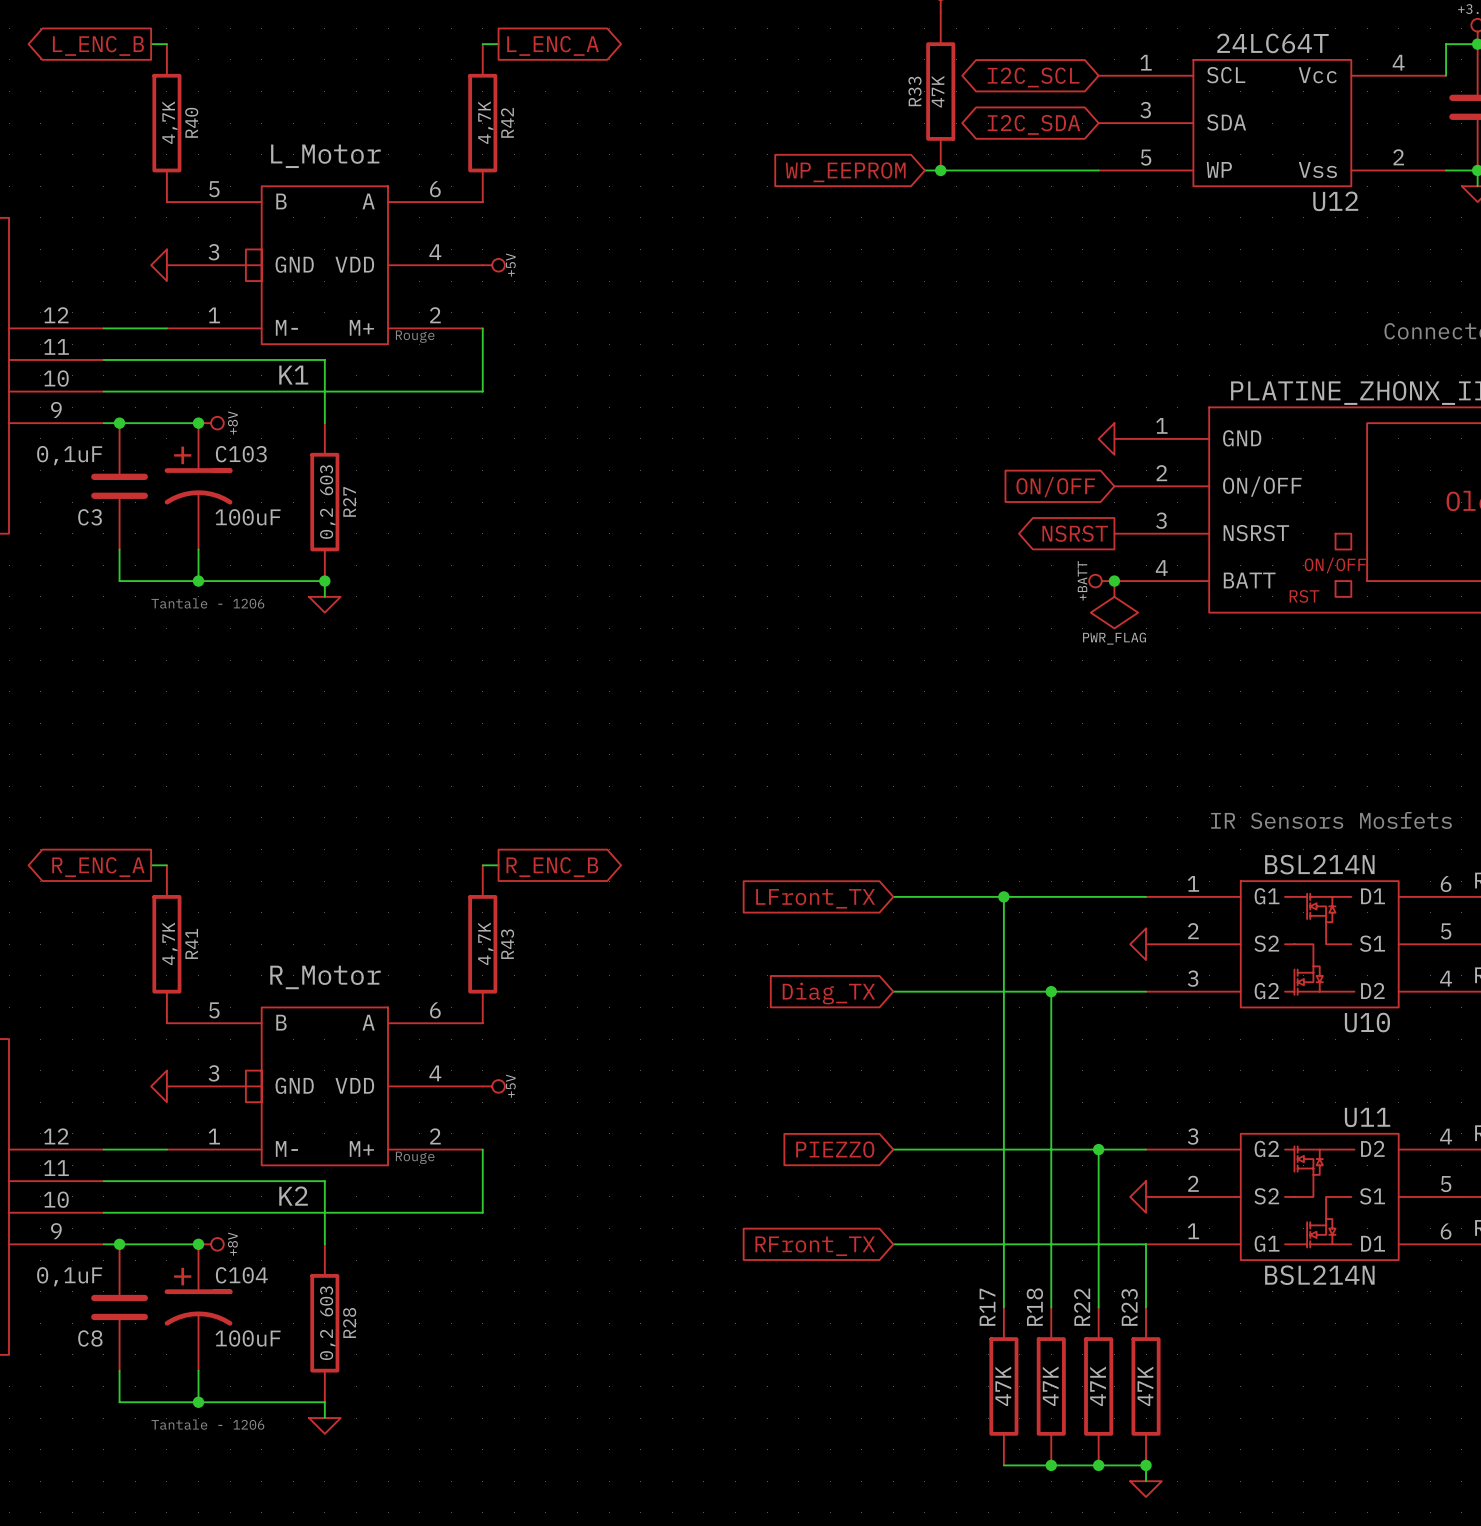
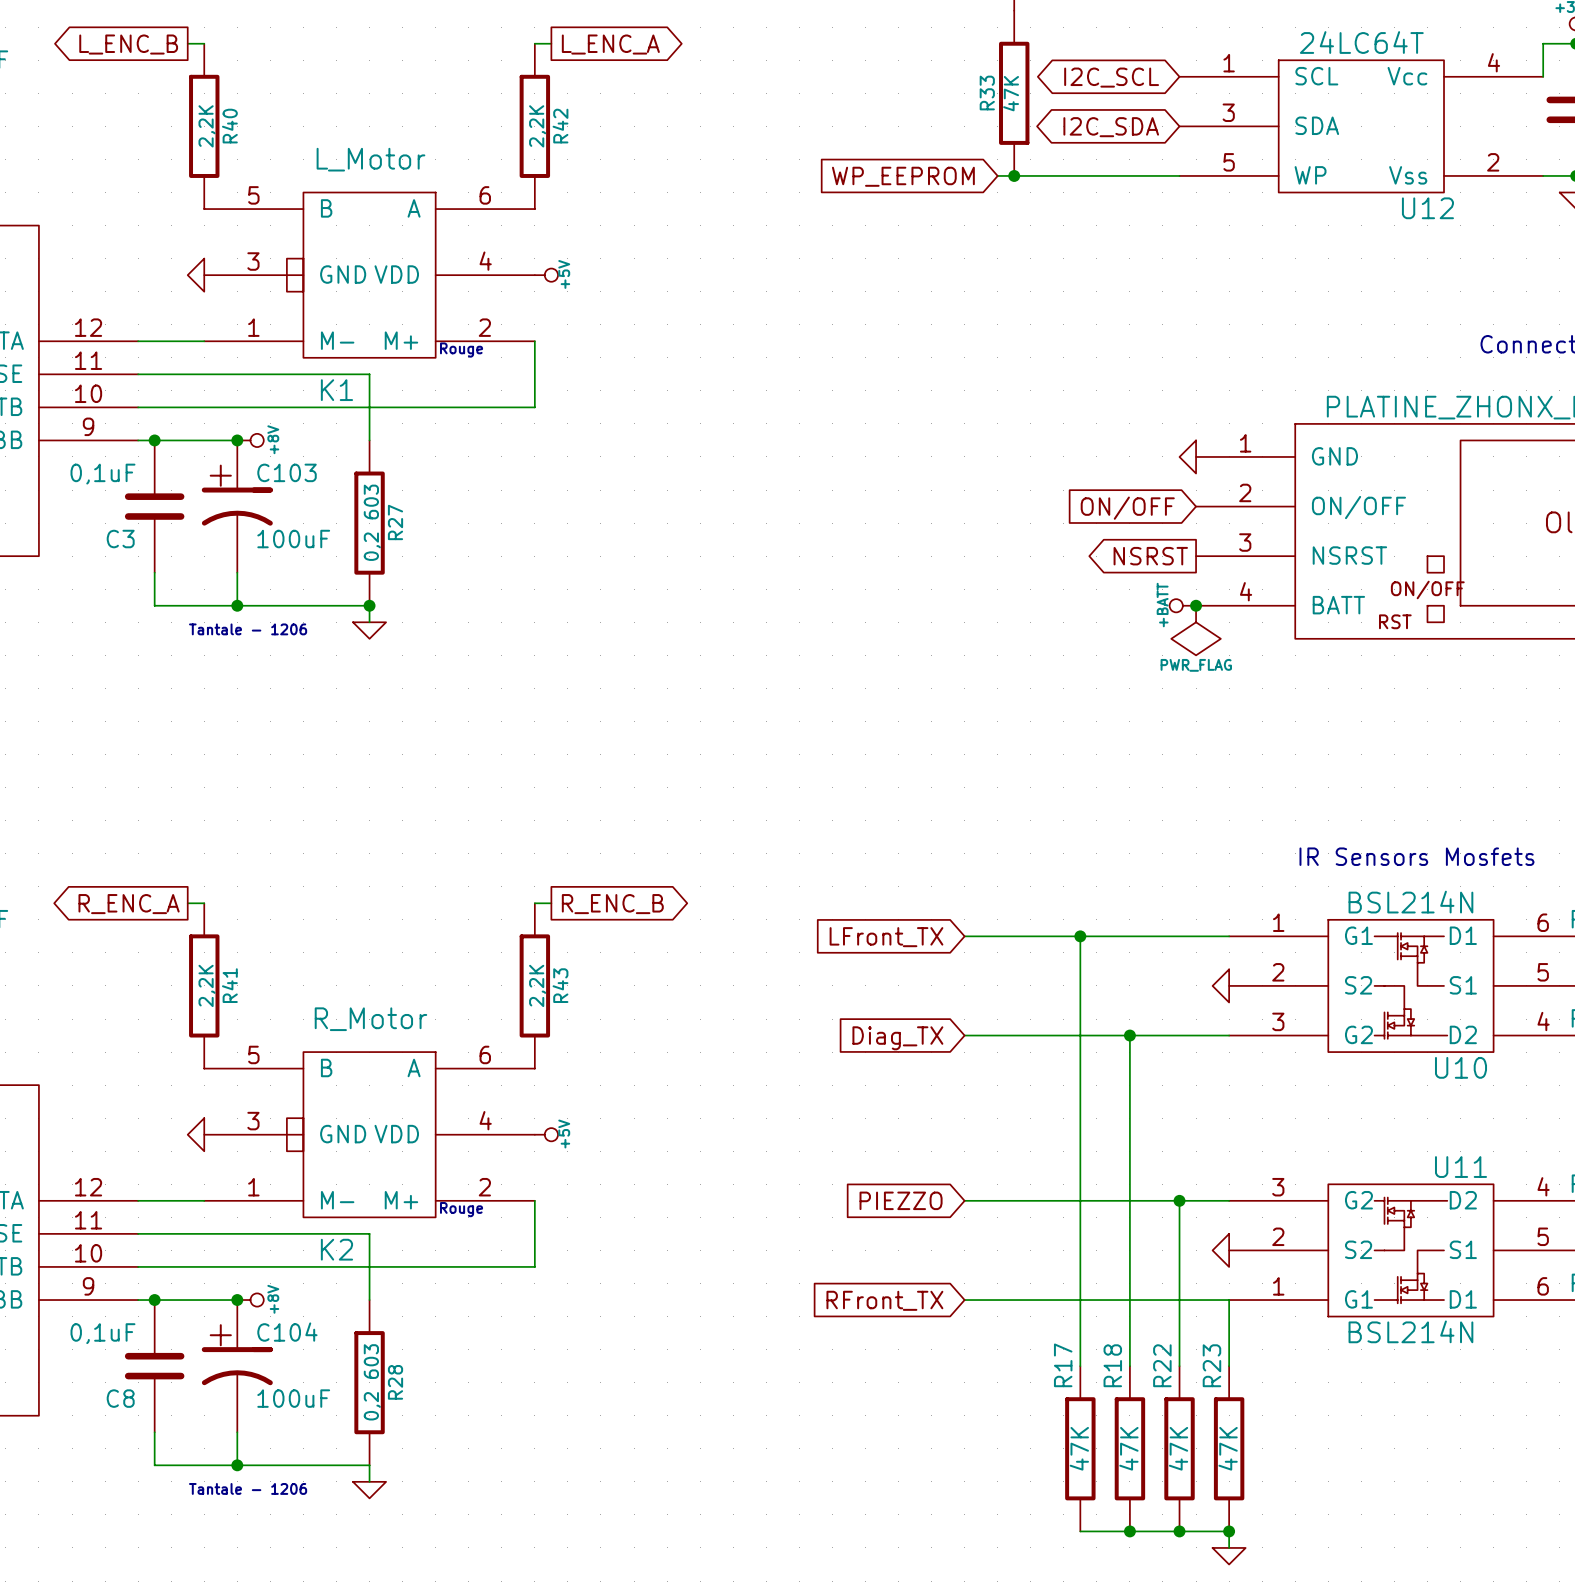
R40 value: 4,7K (169, 122) -> 2,2K (207, 126)
R42 value: 4,7K (485, 122) -> 2,2K (537, 126)
R41 value: 4,7K (169, 943) -> 2,2K (207, 985)
R43 value: 4,7K (485, 943) -> 2,2K (537, 985)

